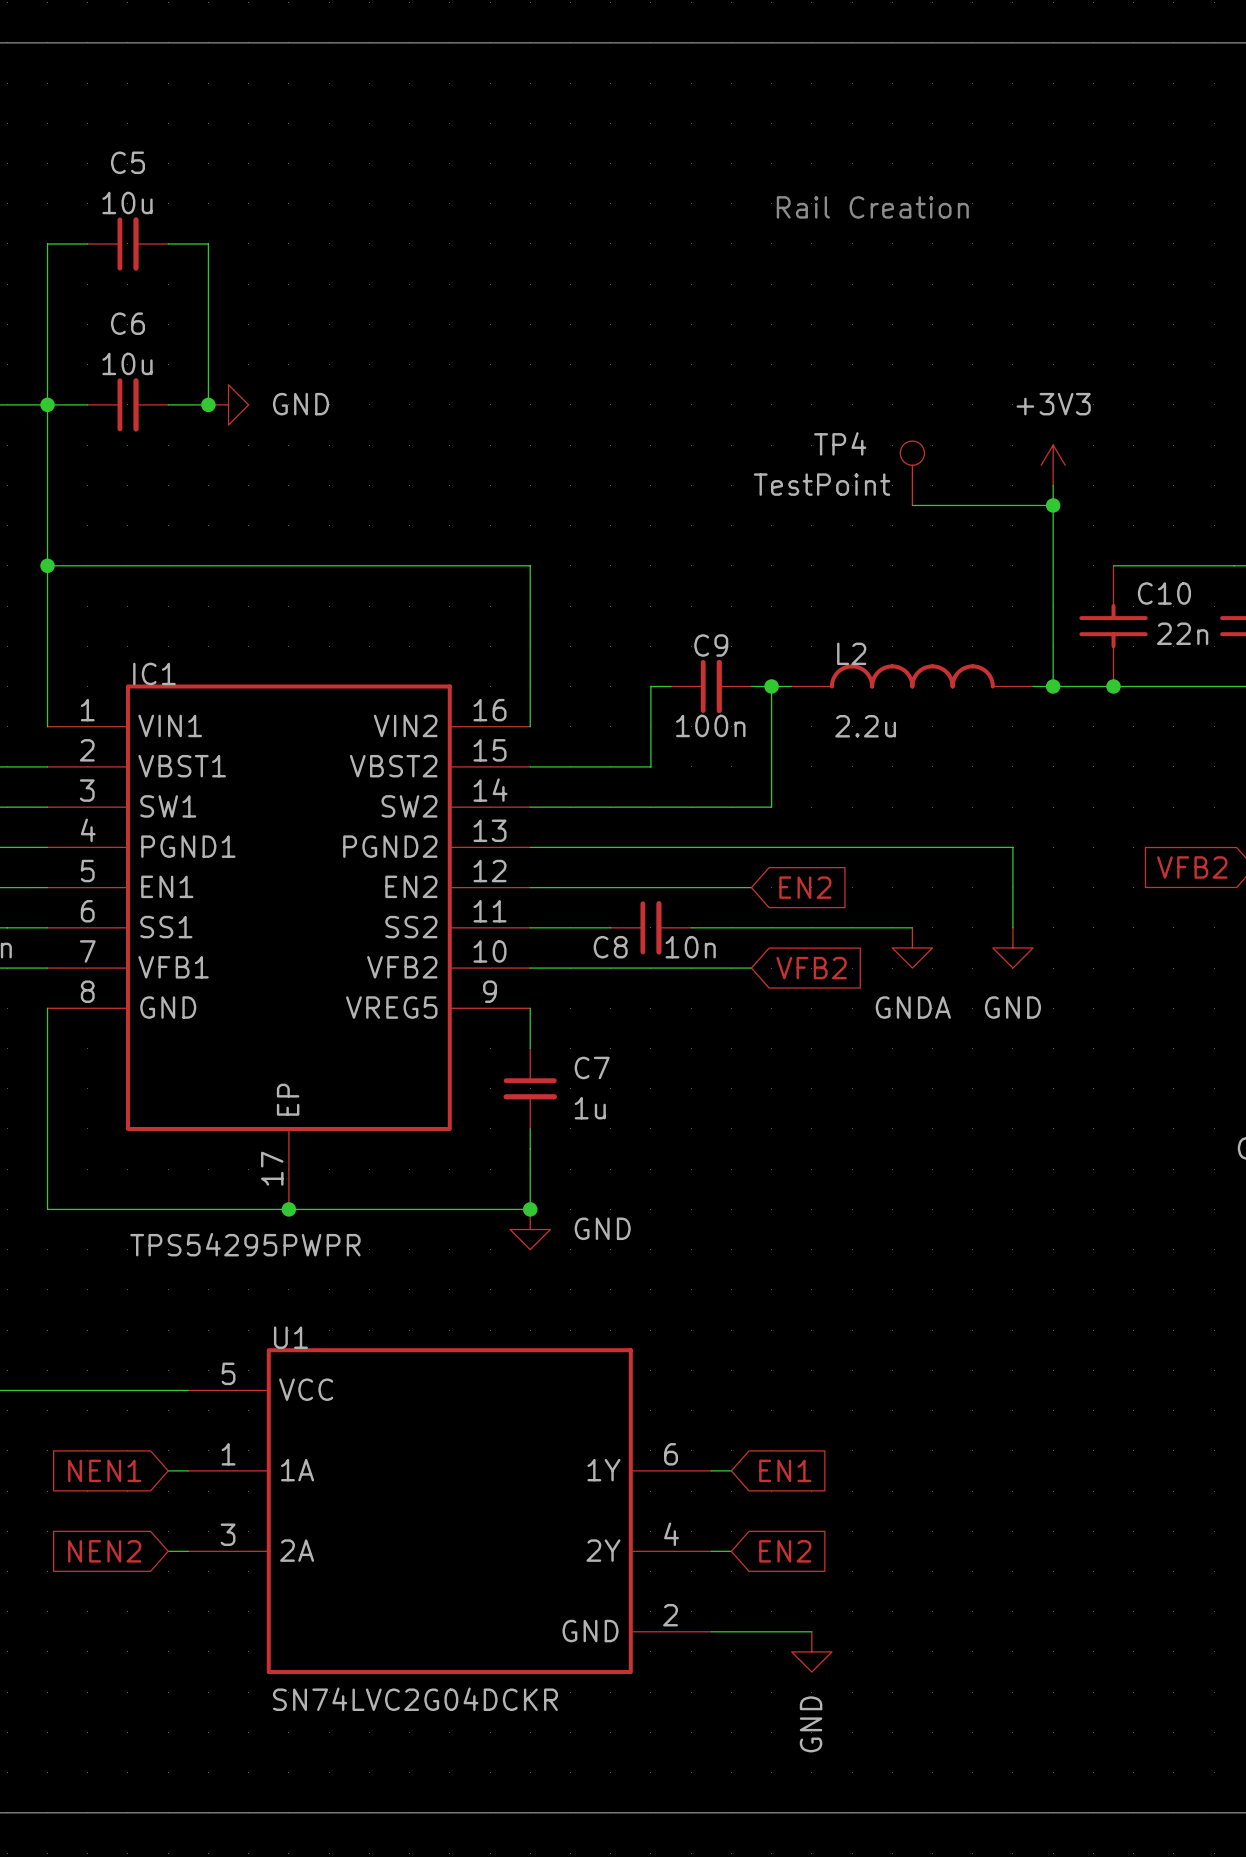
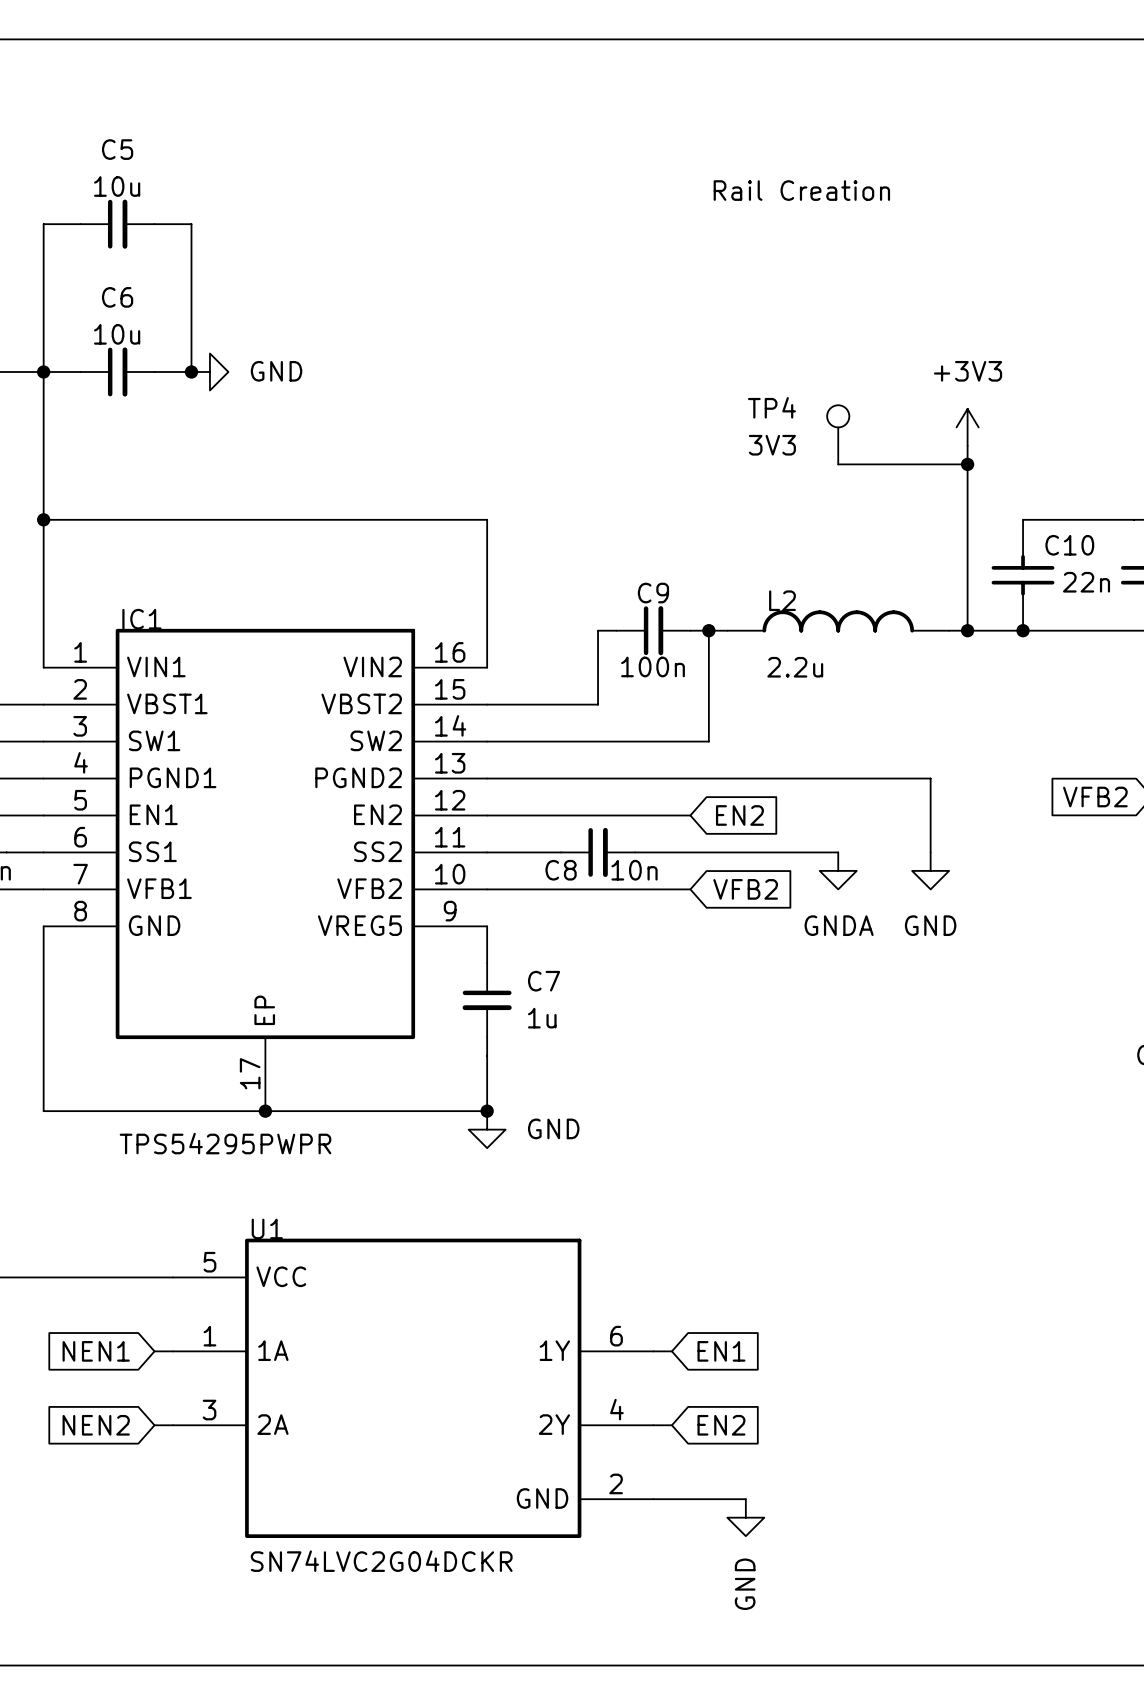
TP4 value: TestPoint (822, 484) -> 3V3 (772, 445)

